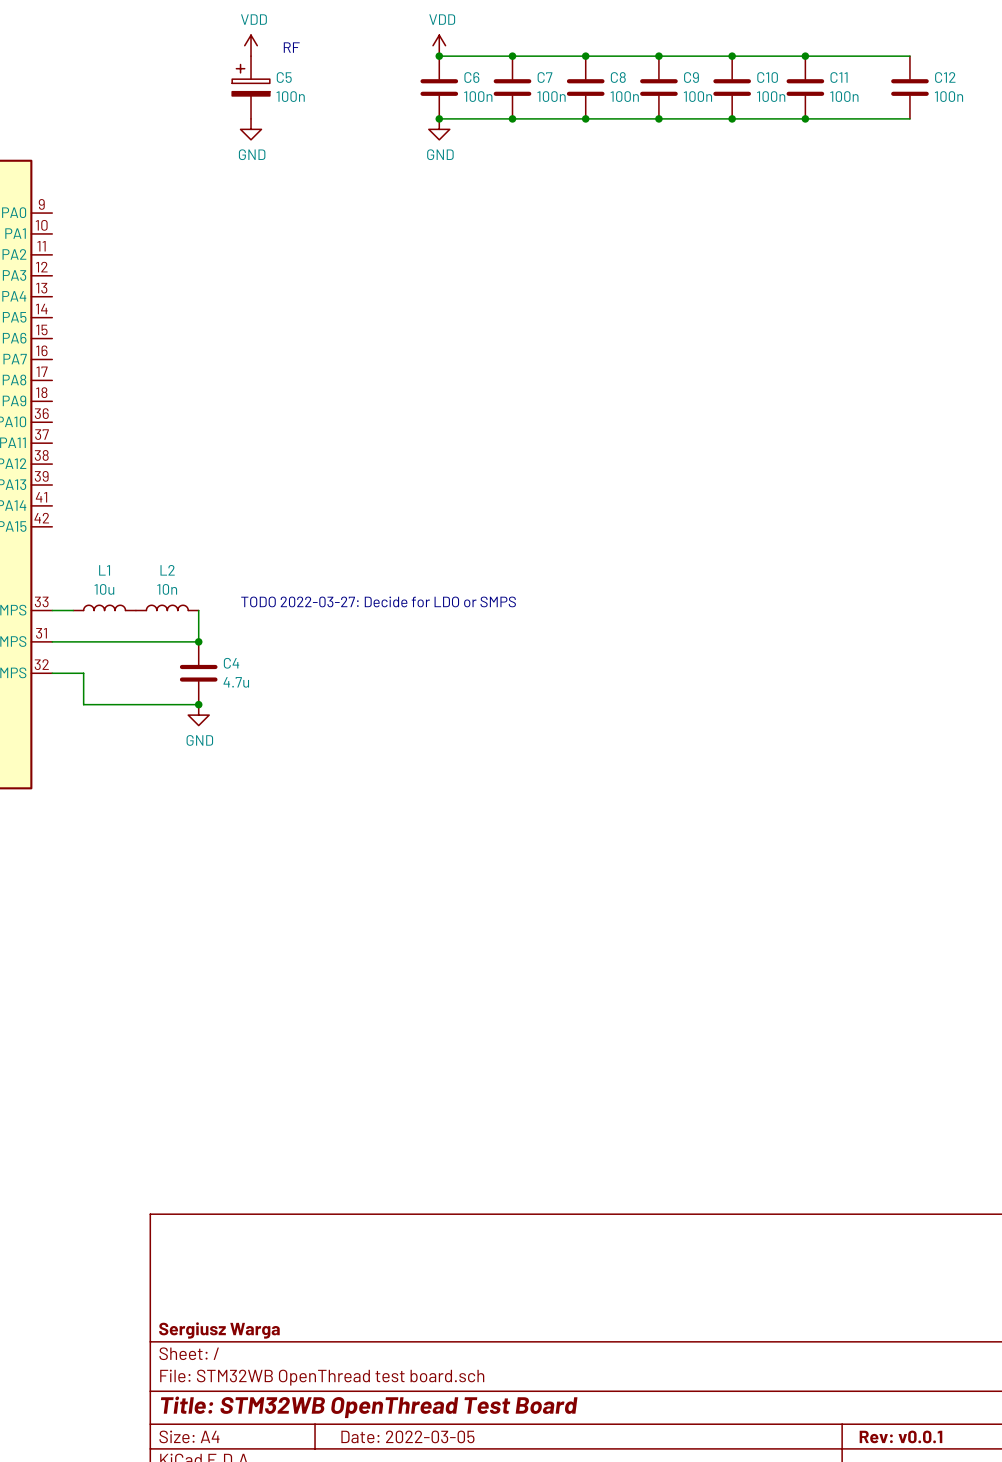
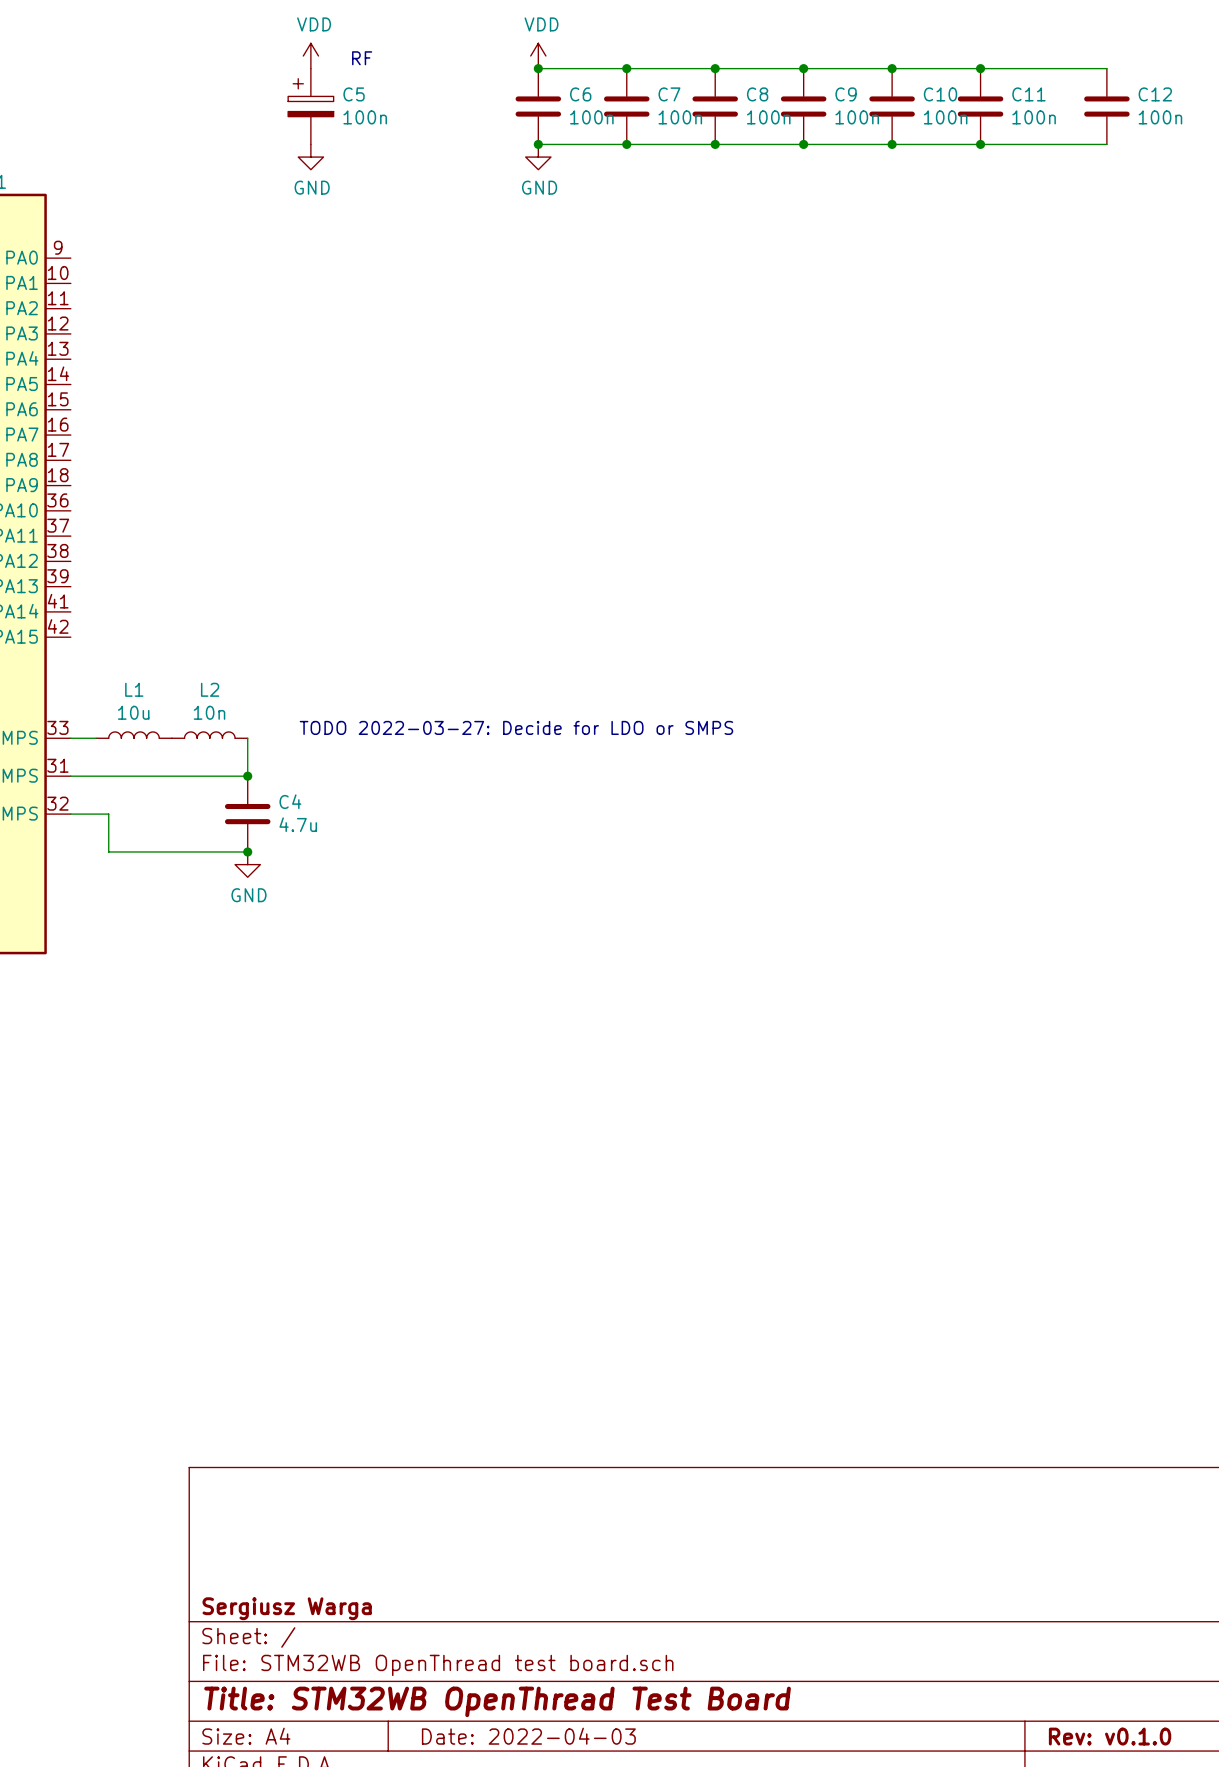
title block: Date: 2022-03-05 (407, 1436) -> Date: 2022-04-03 (528, 1736)
title block: Rev: v0.0.1 (900, 1436) -> Rev: v0.1.0 (1110, 1736)

